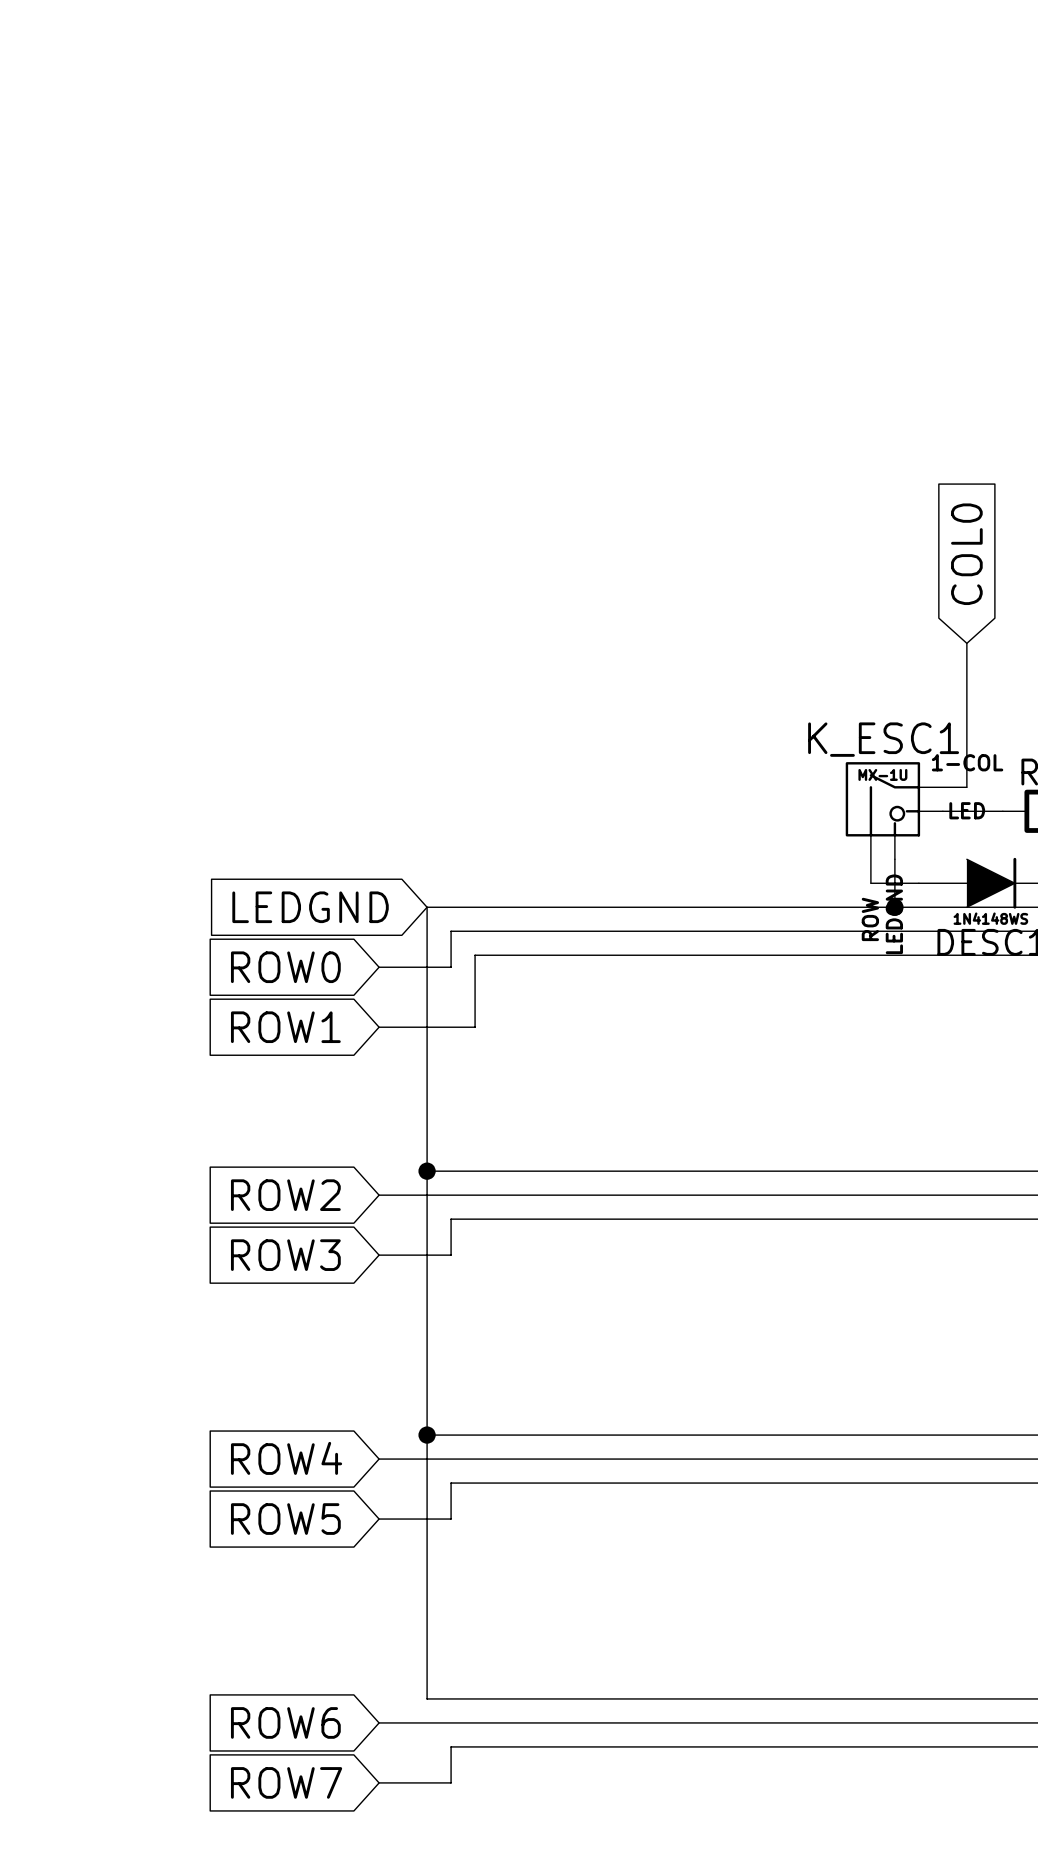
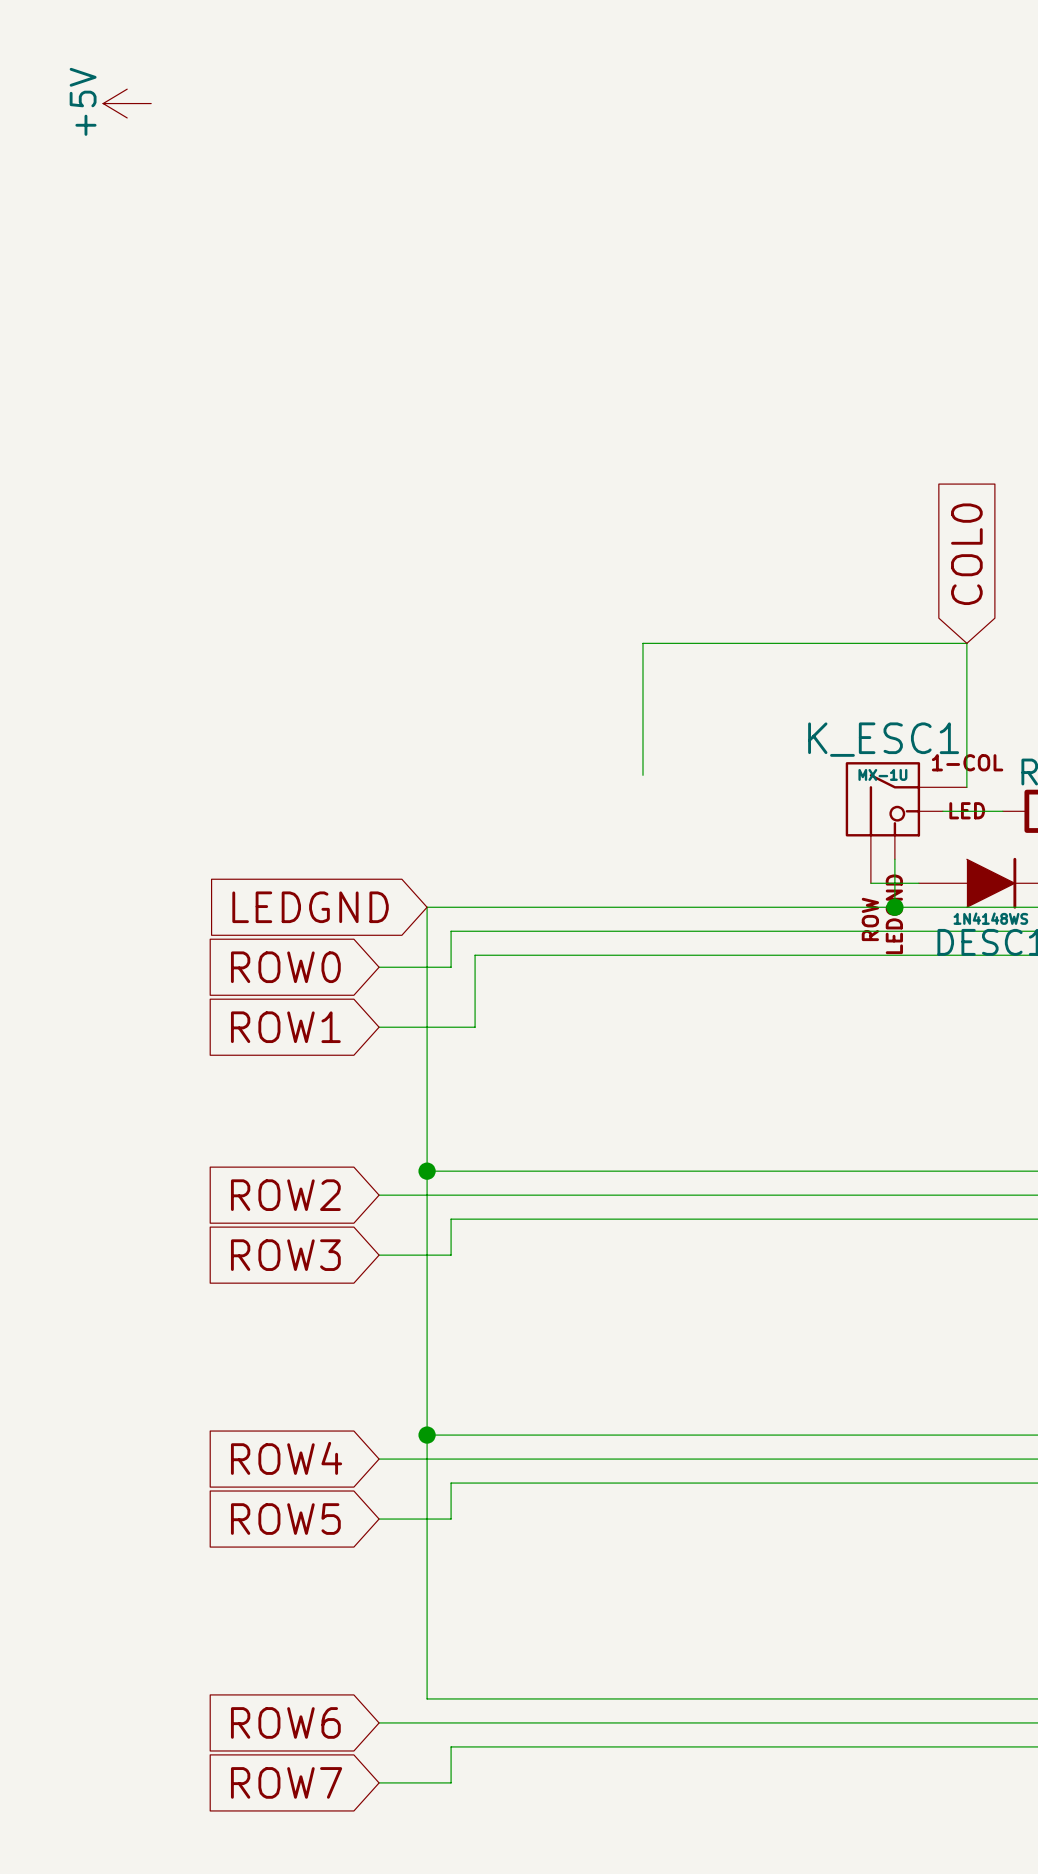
power symbol: none -> +5V (127, 103)
wire: none -> (966, 643) (643, 643) (643, 775)

